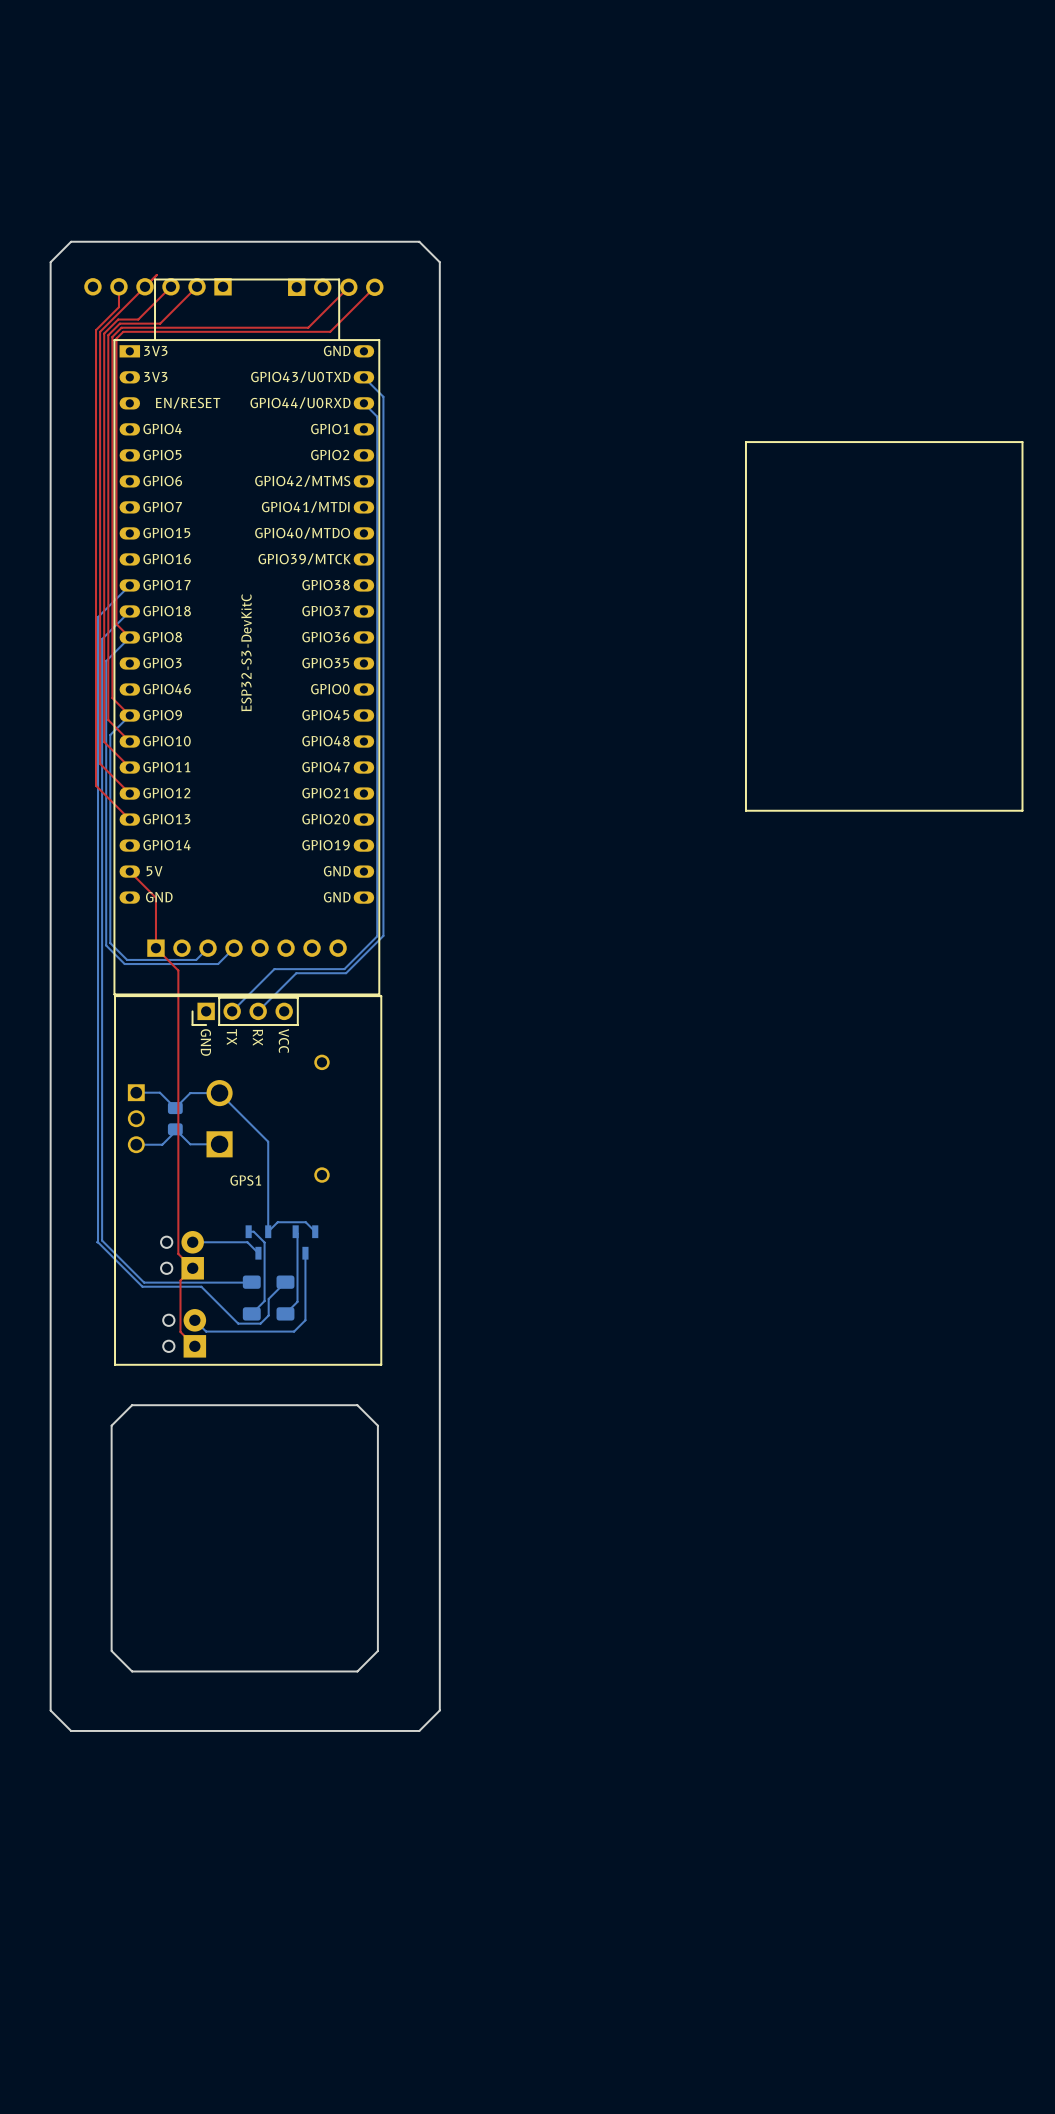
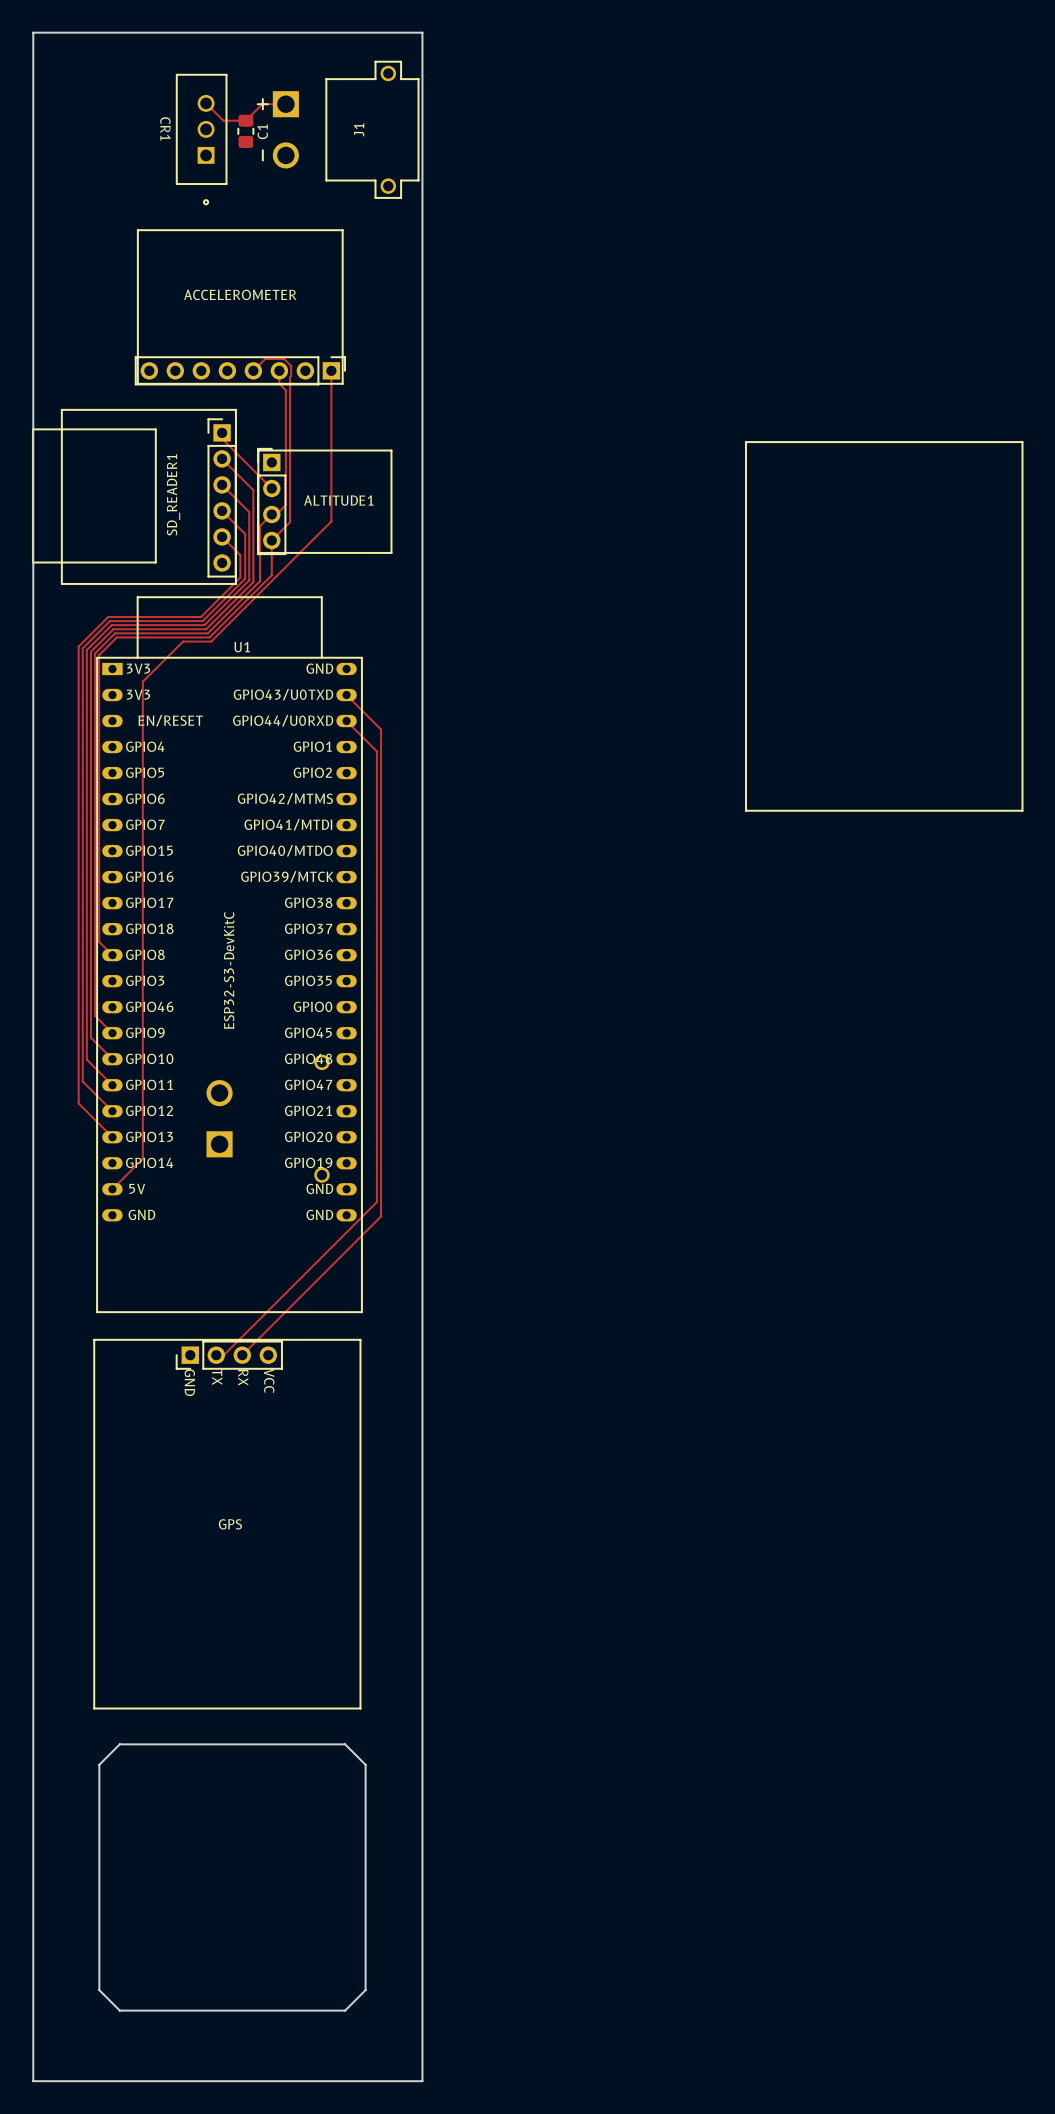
top track: none -> (206, 103) (223, 120) (245, 120) (262, 104) (285, 104)
J1: none -> (338, 129)
C1: none -> (245, 131)
CR1: none -> (201, 139)
line: none -> (137, 230) (342, 230) (342, 383) (137, 383) (137, 230)
board edge: (71, 241) (50, 262) (50, 1710) (71, 1730) (419, 1730) (439, 1710) (439, 262) (419, 241) (71, 241) -> (33, 32) (33, 2081) (422, 2081) (422, 32) (33, 32)
top track: (156, 275) (100, 331) (100, 763) (129, 793) -> none
top track: (118, 286) (118, 307) (96, 330) (96, 785) (129, 819) -> none
SD_READER1 side: bottom (157, 286) -> top (222, 497)
top track: (171, 286) (138, 319) (118, 319) (104, 333) (104, 741) (129, 767) -> none
top track: (197, 286) (160, 323) (119, 323) (108, 335) (108, 720) (129, 741) -> none
ALTITUDE1 side: bottom (335, 287) -> top (271, 501)
top track: (348, 287) (308, 327) (121, 327) (112, 336) (112, 698) (129, 715) -> none
top track: (374, 287) (330, 331) (123, 331) (116, 338) (116, 624) (129, 637) -> none
ACCELEROMETER: none -> (240, 370)
top track: none -> (253, 370) (265, 359) (284, 359) (291, 365) (289, 522) (271, 540) (271, 575) (209, 637) (116, 637) (99, 655) (99, 941) (112, 955)
top track: none -> (279, 370) (279, 383) (285, 390) (285, 505) (276, 514) (271, 514) (260, 526) (260, 581) (207, 633) (115, 633) (95, 653) (95, 1015) (112, 1033)
top track: none -> (331, 370) (331, 521) (211, 641) (183, 641) (142, 681) (142, 1158) (112, 1189)
bottom track: (363, 377) (383, 396) (383, 935) (346, 973) (296, 973) (258, 1011) -> none
bottom track: (363, 403) (377, 416) (377, 936) (344, 969) (274, 969) (232, 1011) -> none
line: none -> (61, 409) (235, 409) (235, 583) (61, 583) (61, 409)
line: none -> (32, 429) (155, 429) (155, 562) (32, 562) (32, 429)
top track: none -> (222, 432) (222, 438) (271, 488)
line: none -> (258, 450) (391, 450) (391, 552) (258, 552) (258, 450)
top track: none -> (222, 458) (253, 490) (253, 582) (206, 629) (113, 629) (90, 651) (90, 1037) (112, 1059)
top track: none -> (222, 484) (249, 512) (249, 580) (204, 625) (111, 625) (86, 650) (86, 1059) (112, 1085)
top track: none -> (222, 510) (245, 534) (245, 578) (202, 621) (110, 621) (82, 648) (82, 1081) (112, 1111)
top track: none -> (222, 536) (240, 555) (240, 577) (201, 616) (108, 616) (78, 646) (78, 1103) (112, 1137)
bottom track: (129, 585) (98, 617) (97, 1242) (142, 1286) (201, 1286) (238, 1323) (260, 1323) (268, 1315) (268, 1298) (285, 1282) -> none
bottom track: (129, 611) (102, 639) (102, 1240) (144, 1282) (251, 1282) -> none
part: ESP32-S3-DevKitC (246, 636) -> none
bottom track: (129, 637) (106, 661) (106, 945) (124, 964) (218, 964) (234, 948) -> none
top track: none -> (346, 695) (381, 729) (381, 1216) (242, 1355)
bottom track: (129, 715) (110, 735) (110, 943) (127, 959) (196, 959) (208, 948) -> none
top track: none -> (346, 721) (376, 751) (376, 1202) (223, 1355) (216, 1355)
top track: (129, 871) (155, 897) (155, 948) (178, 970) (178, 1253) (192, 1268) (180, 1280) (180, 1331) (194, 1346) -> none
part: (247, 948) -> none
U1: none -> ESP32-S3-DevKitC (229, 954)
line: (115, 996) (381, 996) (381, 1364) (115, 1364) (115, 996) -> none
GPS1: (245, 1011) -> none
text: TX (231, 1037) -> none
text: RX (257, 1037) -> none
text: VCC (283, 1041) -> none
text: GND (205, 1042) -> none
bottom track: (136, 1092) (159, 1092) (175, 1108) (190, 1093) (219, 1093) (268, 1141) (268, 1231) (277, 1222) (305, 1222) (315, 1231) -> none
part: (136, 1118) -> none
part: (175, 1118) -> none
bottom track: (219, 1144) (190, 1144) (175, 1129) (175, 1131) (162, 1144) (136, 1144) -> none
bottom track: (248, 1231) (253, 1231) (264, 1242) (264, 1301) (251, 1313) -> none
bottom track: (295, 1231) (297, 1233) (297, 1301) (285, 1313) -> none
bottom track: (192, 1242) (247, 1242) (258, 1253) -> none
part: (258, 1242) -> none
part: (305, 1242) -> none
bottom track: (305, 1253) (305, 1320) (294, 1331) (206, 1331) (194, 1320) -> none
part: (182, 1255) -> none
part: (251, 1298) -> none
part: (285, 1298) -> none
part: (184, 1333) -> none
line: none -> (94, 1339) (360, 1339) (360, 1708) (94, 1708) (94, 1339)
GPS: none -> (229, 1355)
text: none -> TX (217, 1377)
text: none -> RX (243, 1377)
text: none -> VCC (269, 1381)
text: none -> GND (189, 1382)
board edge: (132, 1405) (111, 1425) (111, 1650) (132, 1671) (357, 1671) (377, 1650) (377, 1425) (357, 1405) (132, 1405) -> none
board edge: none -> (119, 1744) (99, 1764) (99, 1990) (119, 2010) (345, 2010) (365, 1990) (365, 1764) (345, 1744) (119, 1744)

